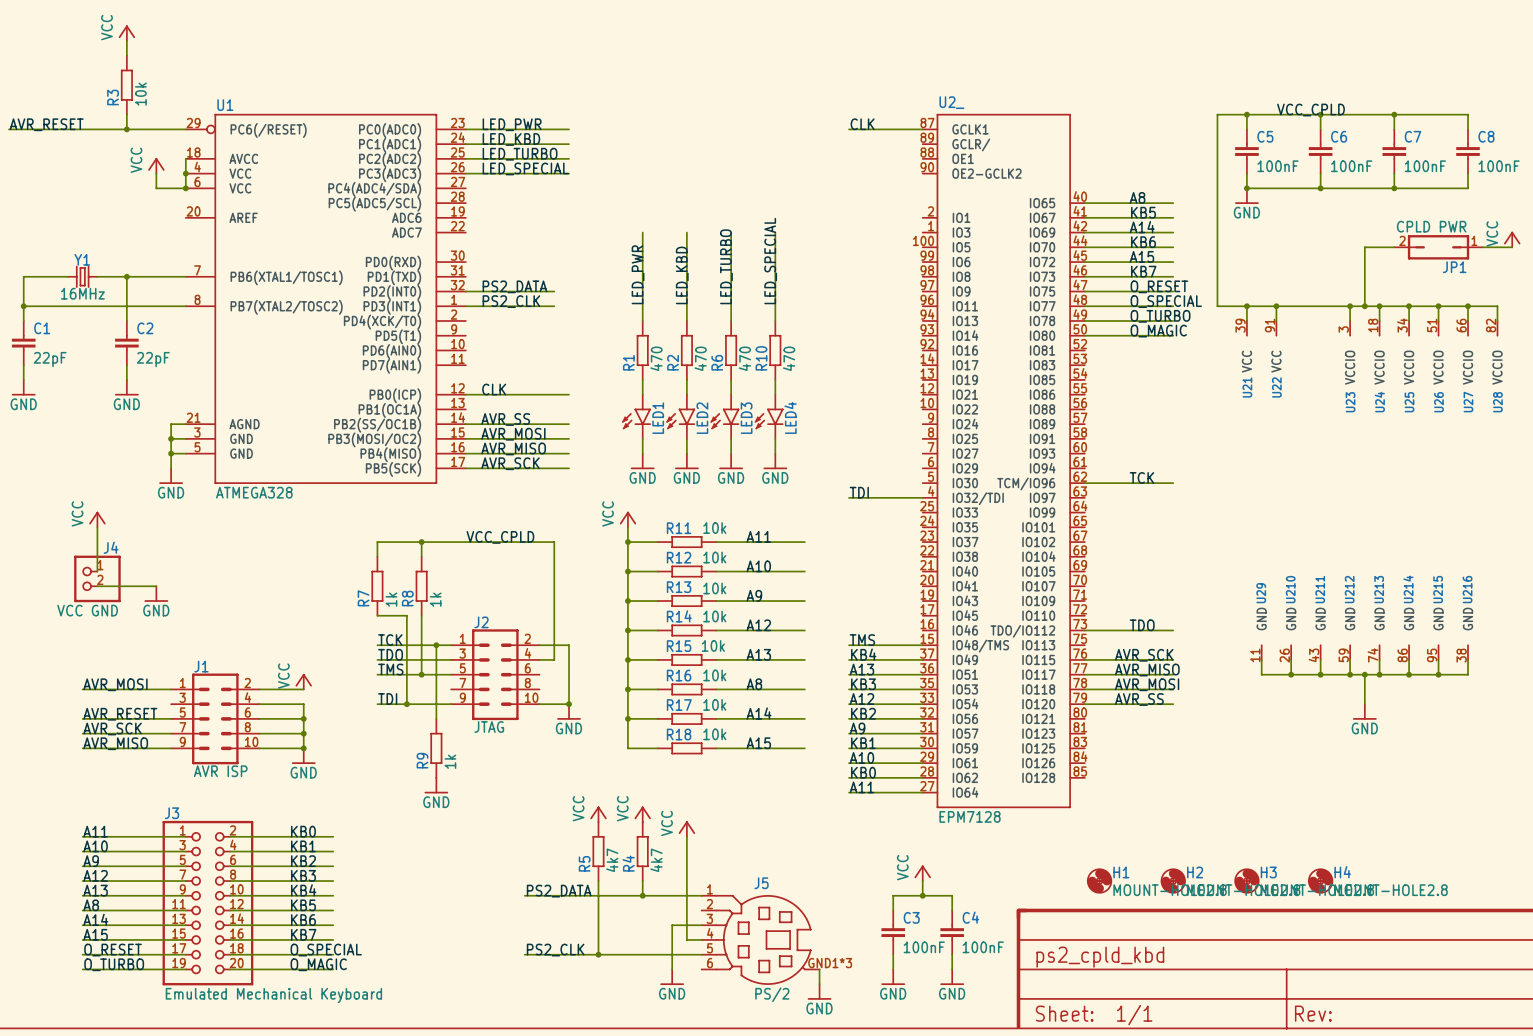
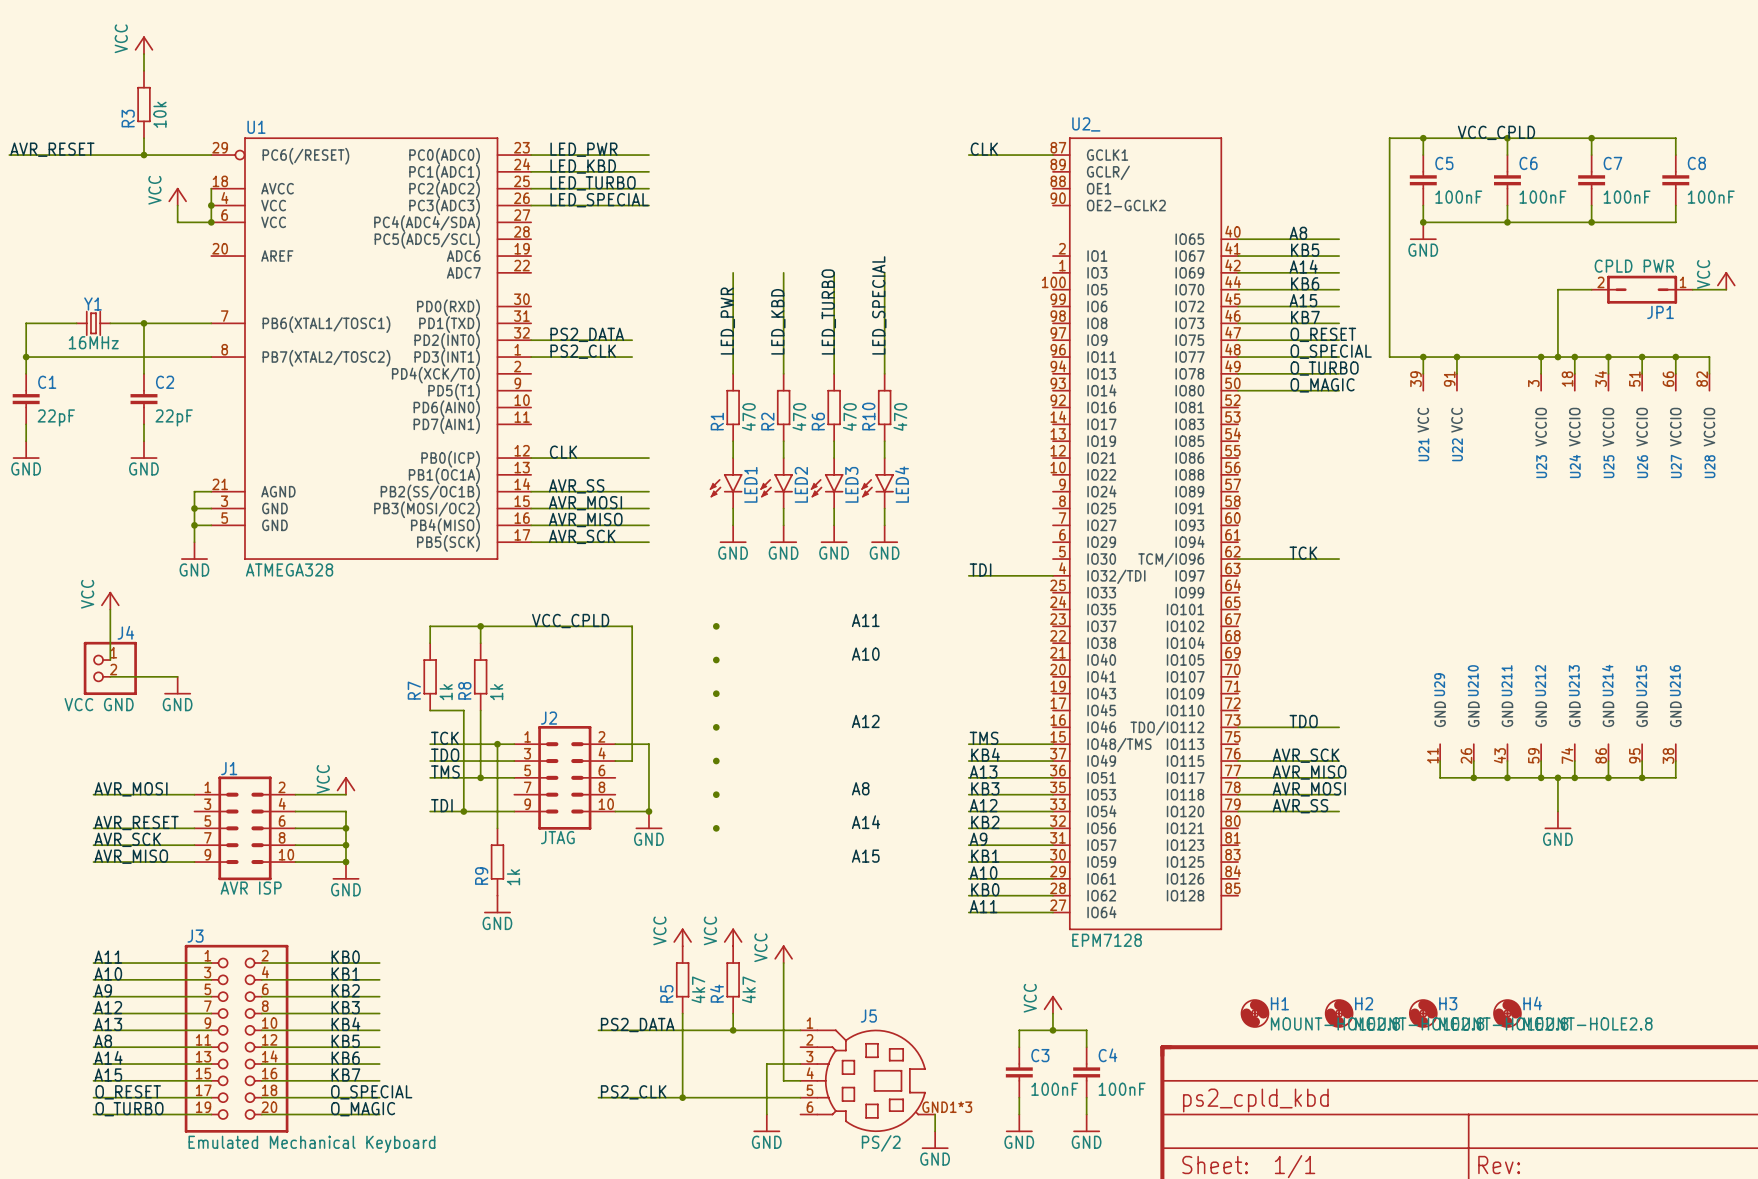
power symbol: VCC (627, 519) -> none
wire: (627, 527) (627, 748) (657, 748) -> none
wire: (627, 542) (657, 542) -> none
R11: 10k (686, 542) -> none
wire: (716, 542) (804, 542) -> none
wire: (627, 571) (657, 571) -> none
R12: 10k (686, 571) -> none
wire: (716, 571) (804, 571) -> none
label: A9 (754, 595) -> none
wire: (627, 601) (657, 601) -> none
R13: 10k (686, 601) -> none
wire: (716, 601) (804, 601) -> none
wire: (627, 630) (657, 630) -> none
R14: 10k (686, 630) -> none
wire: (716, 630) (804, 630) -> none
label: A13 (758, 654) -> none
wire: (627, 659) (657, 659) -> none
R15: 10k (686, 659) -> none
wire: (716, 659) (804, 659) -> none
wire: (627, 689) (657, 689) -> none
R16: 10k (686, 689) -> none
wire: (716, 689) (804, 689) -> none
wire: (627, 718) (657, 718) -> none
R17: 10k (686, 718) -> none
wire: (716, 718) (804, 718) -> none
R18: 10k (686, 748) -> none
wire: (716, 748) (804, 748) -> none

